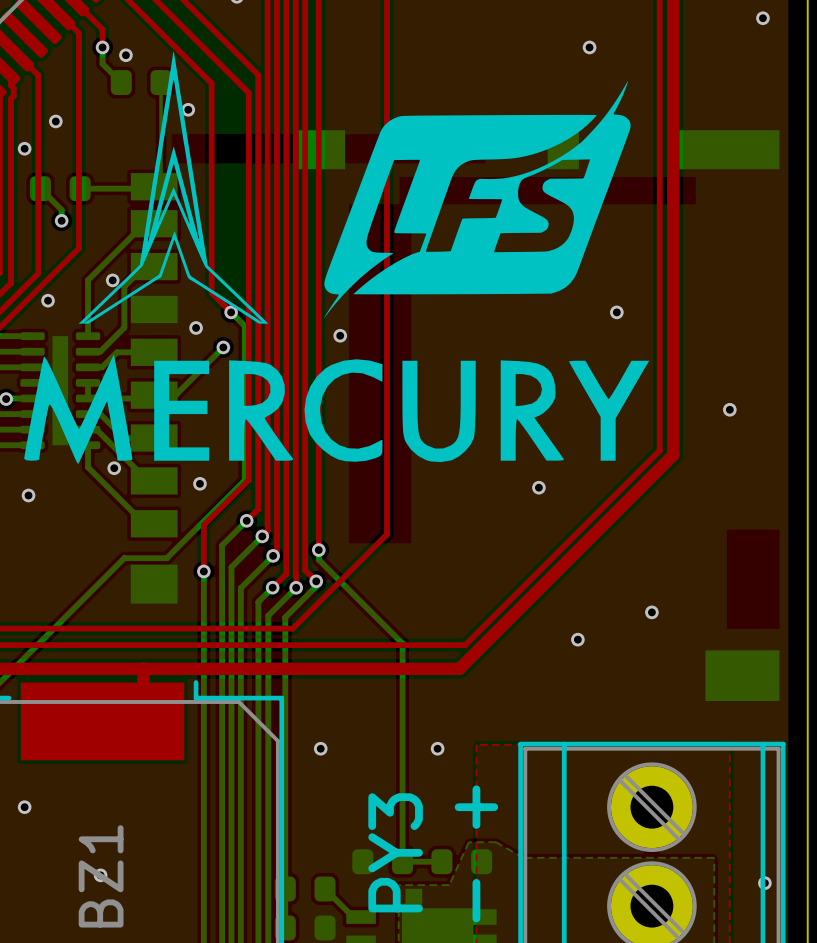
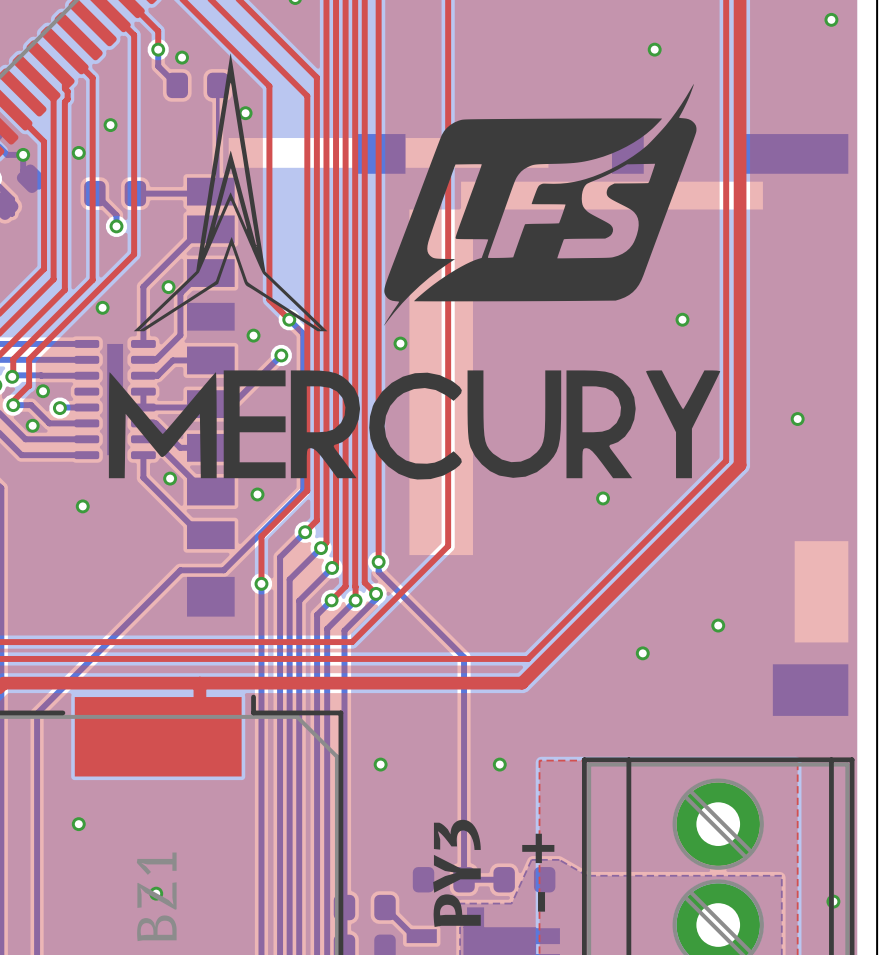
drawing shape: [24, 354, 650, 465] -> [108, 370, 721, 480]

